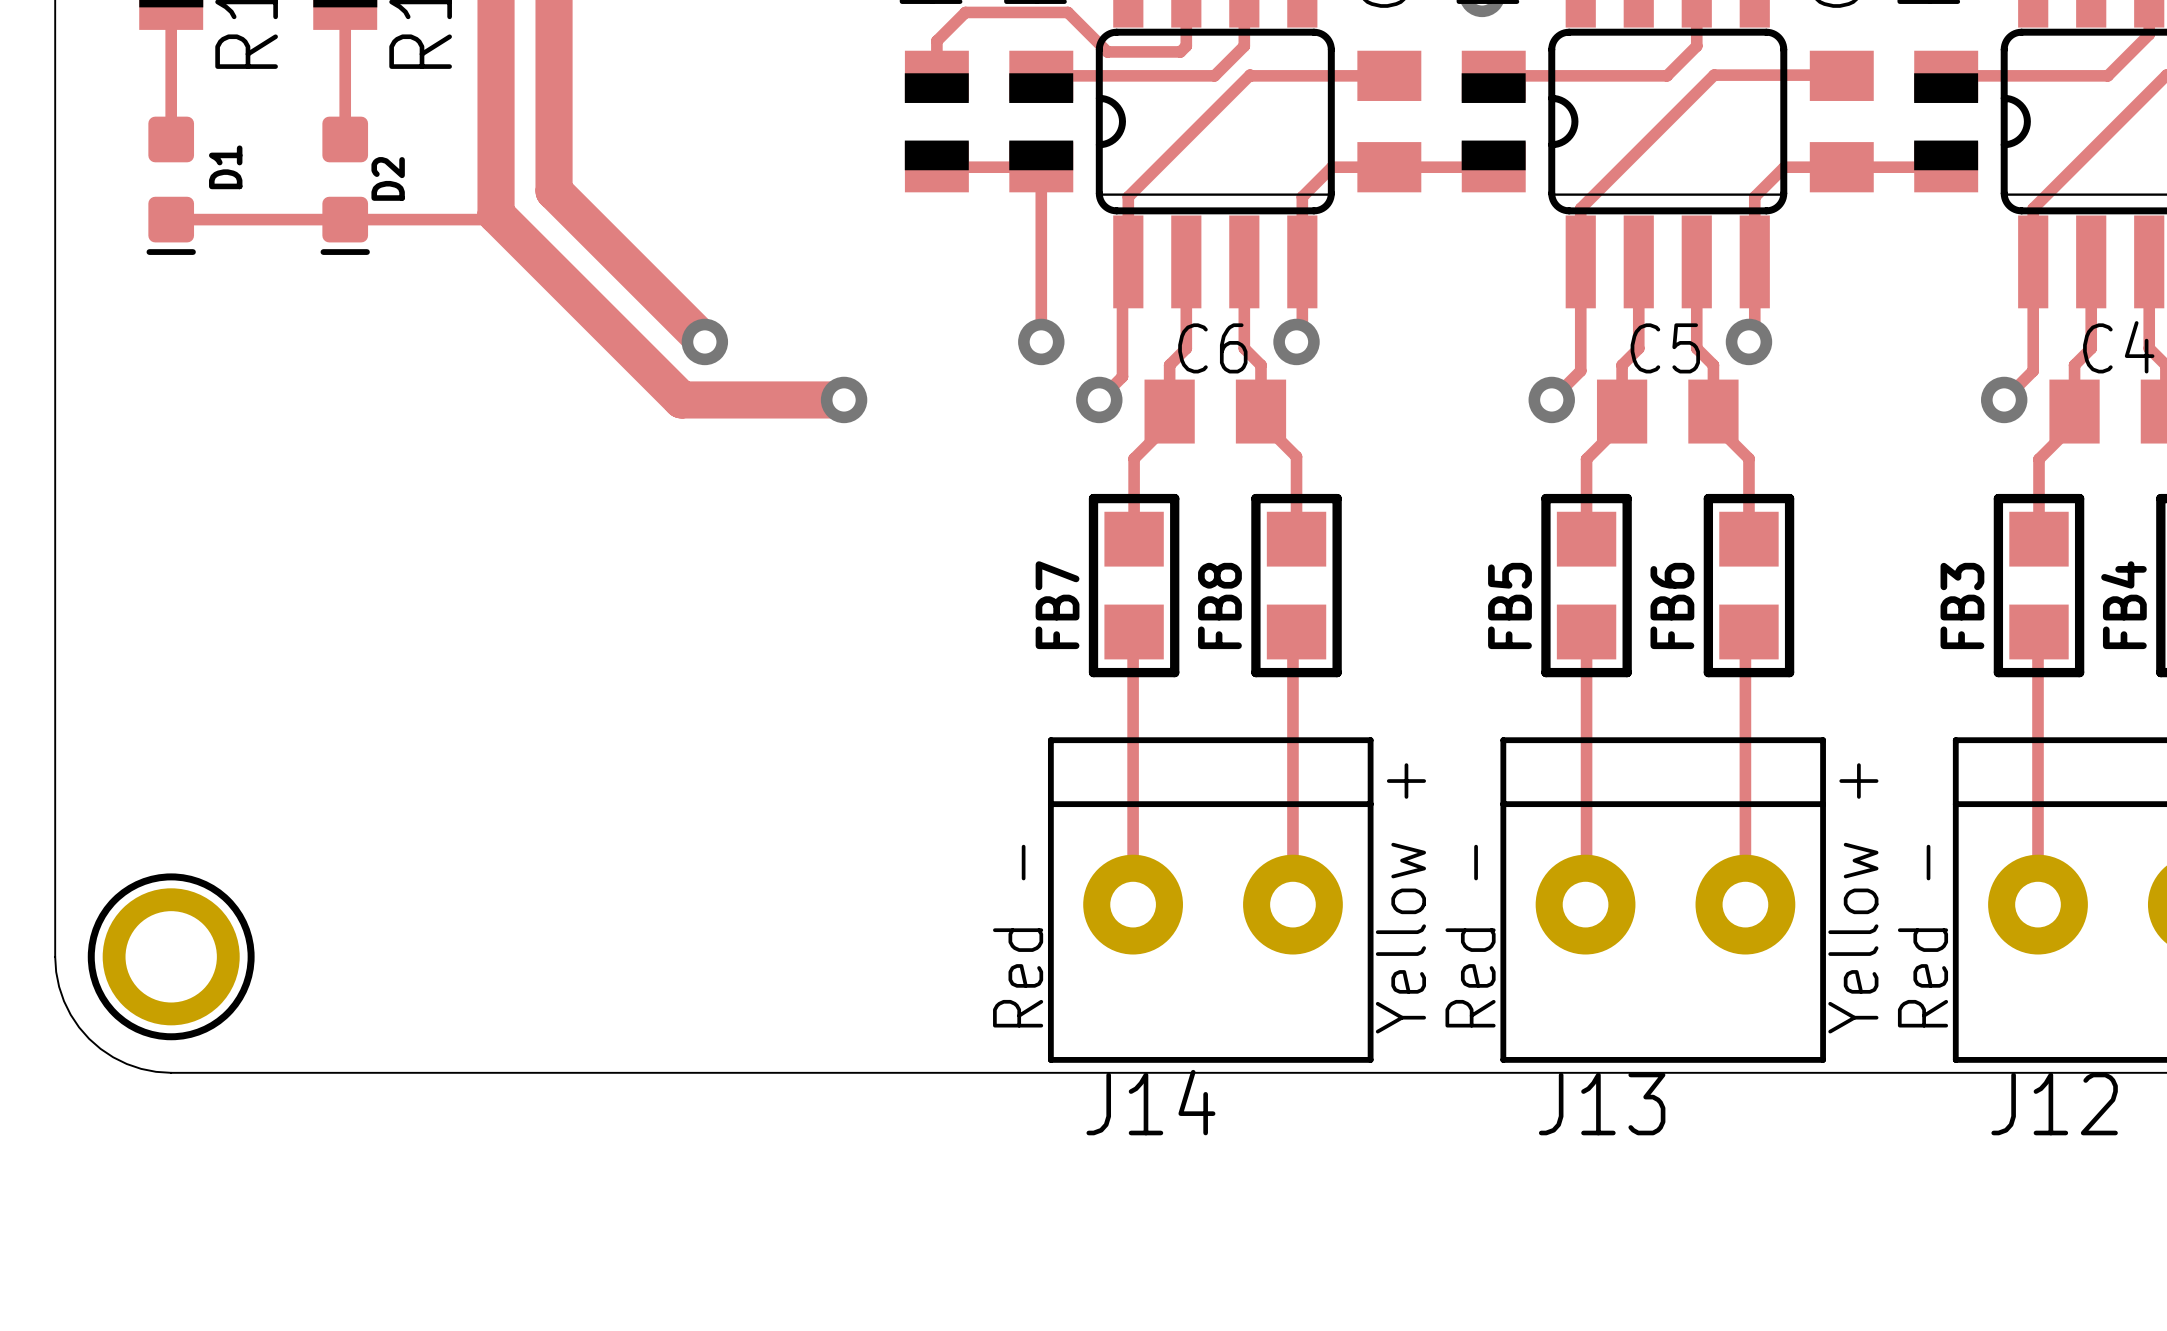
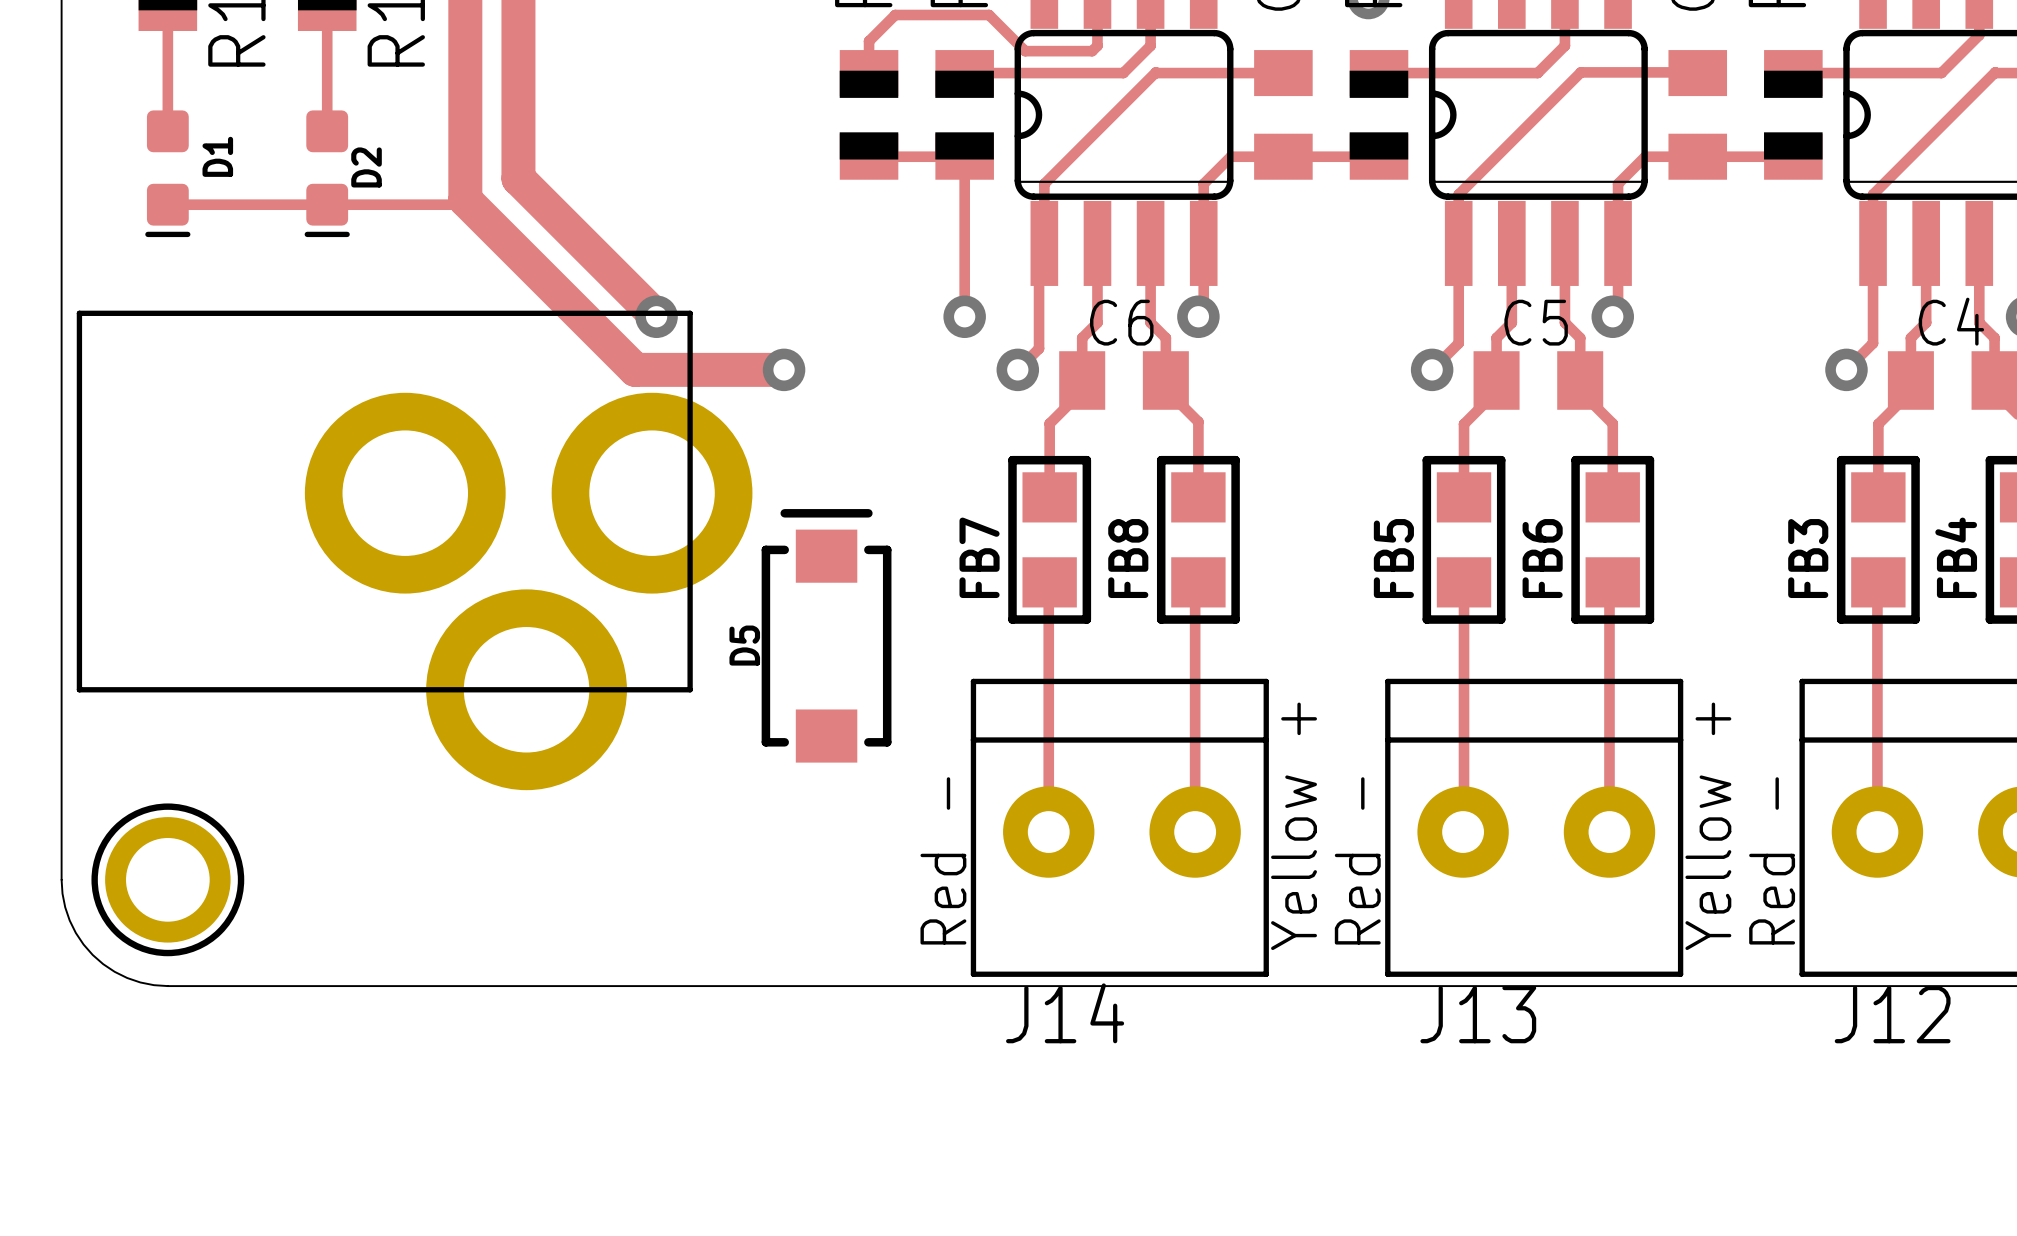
part: none -> (414, 550)
D5: none -> (826, 635)

